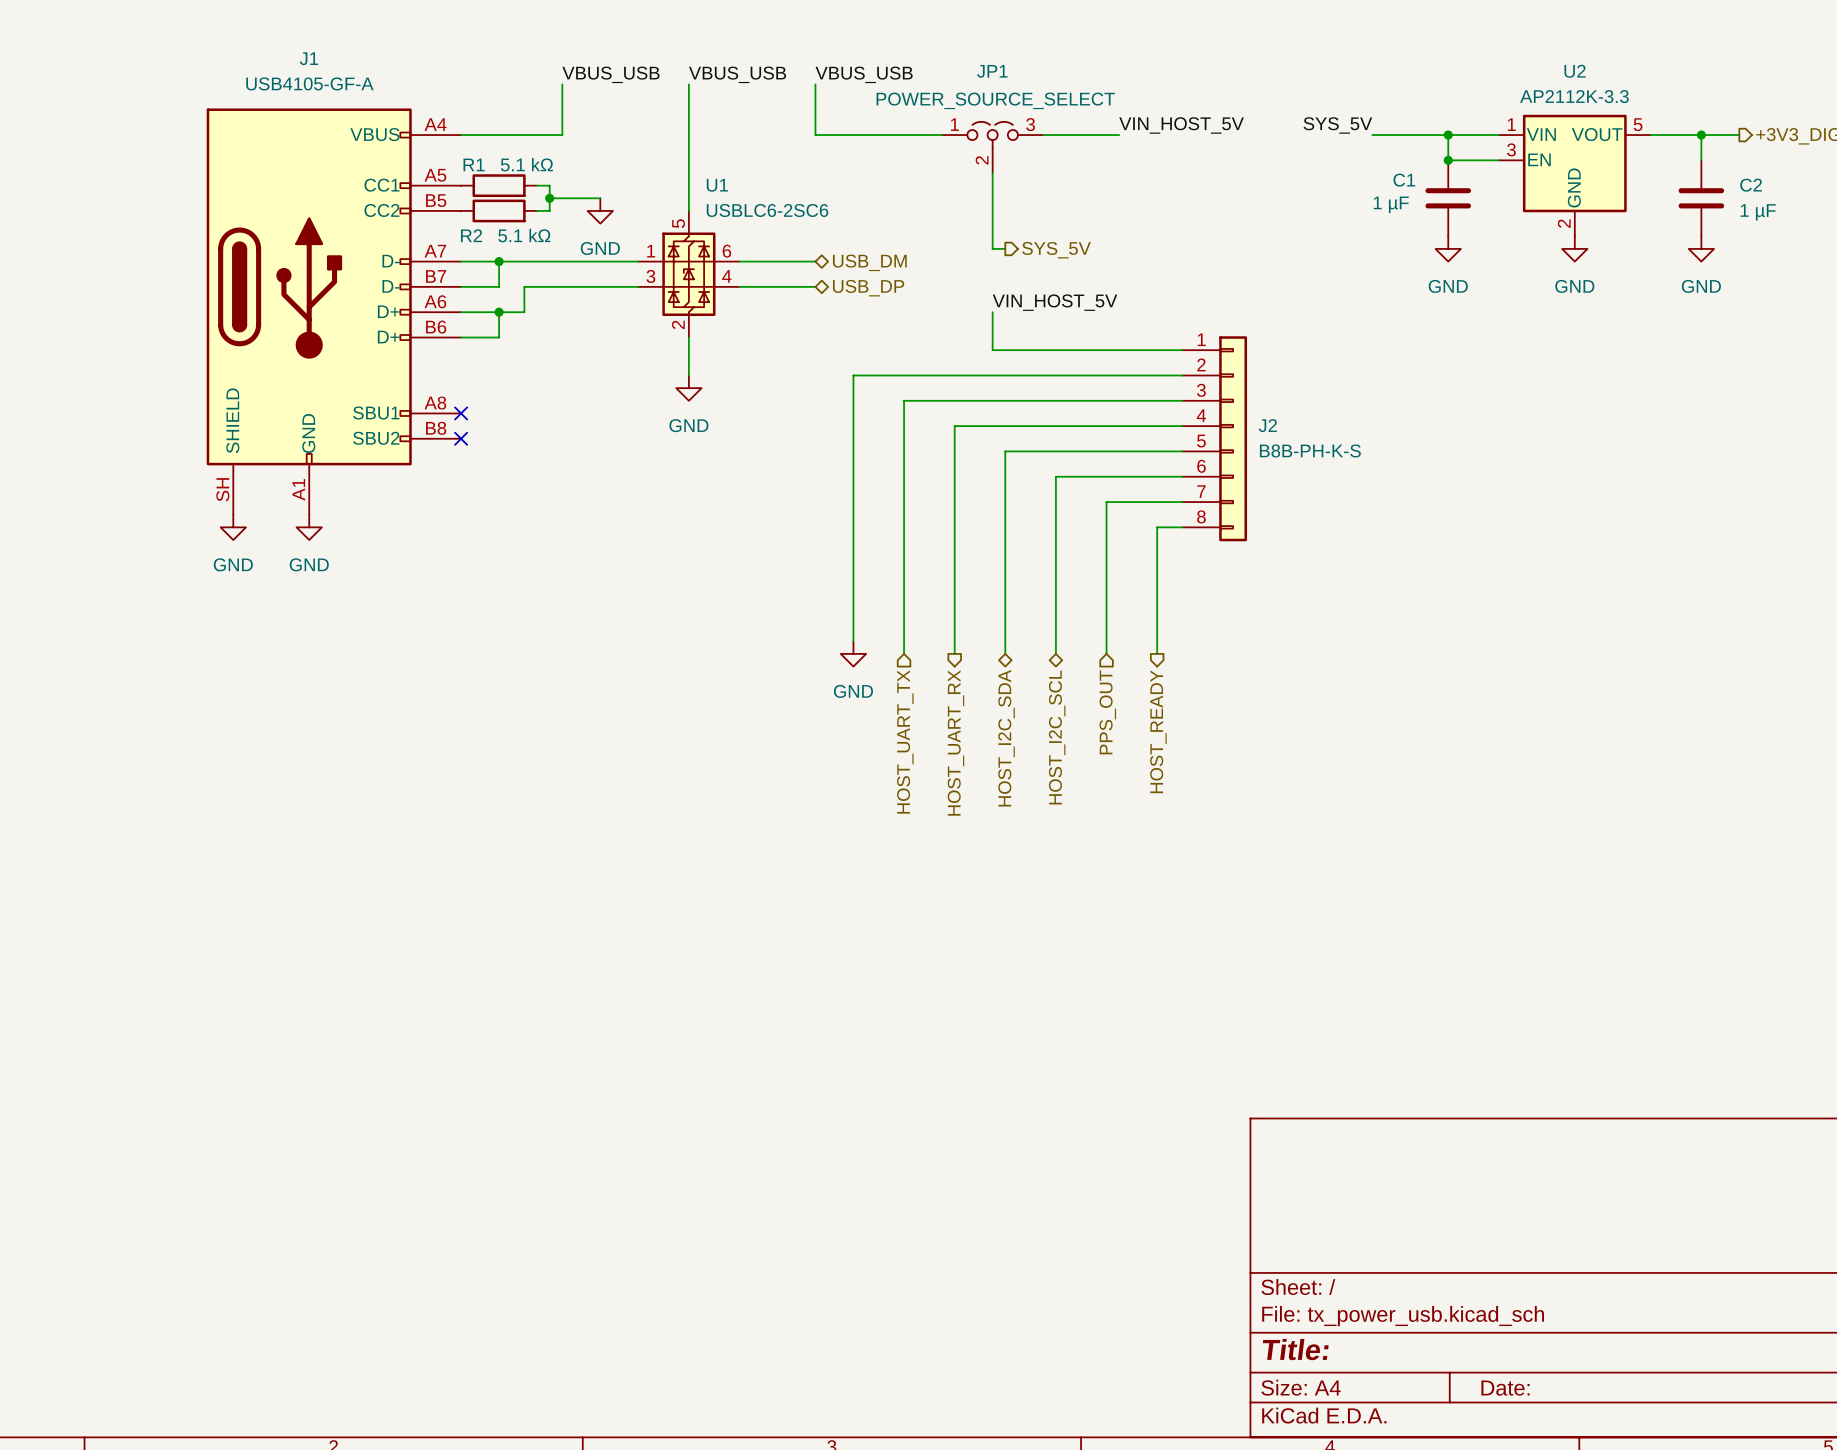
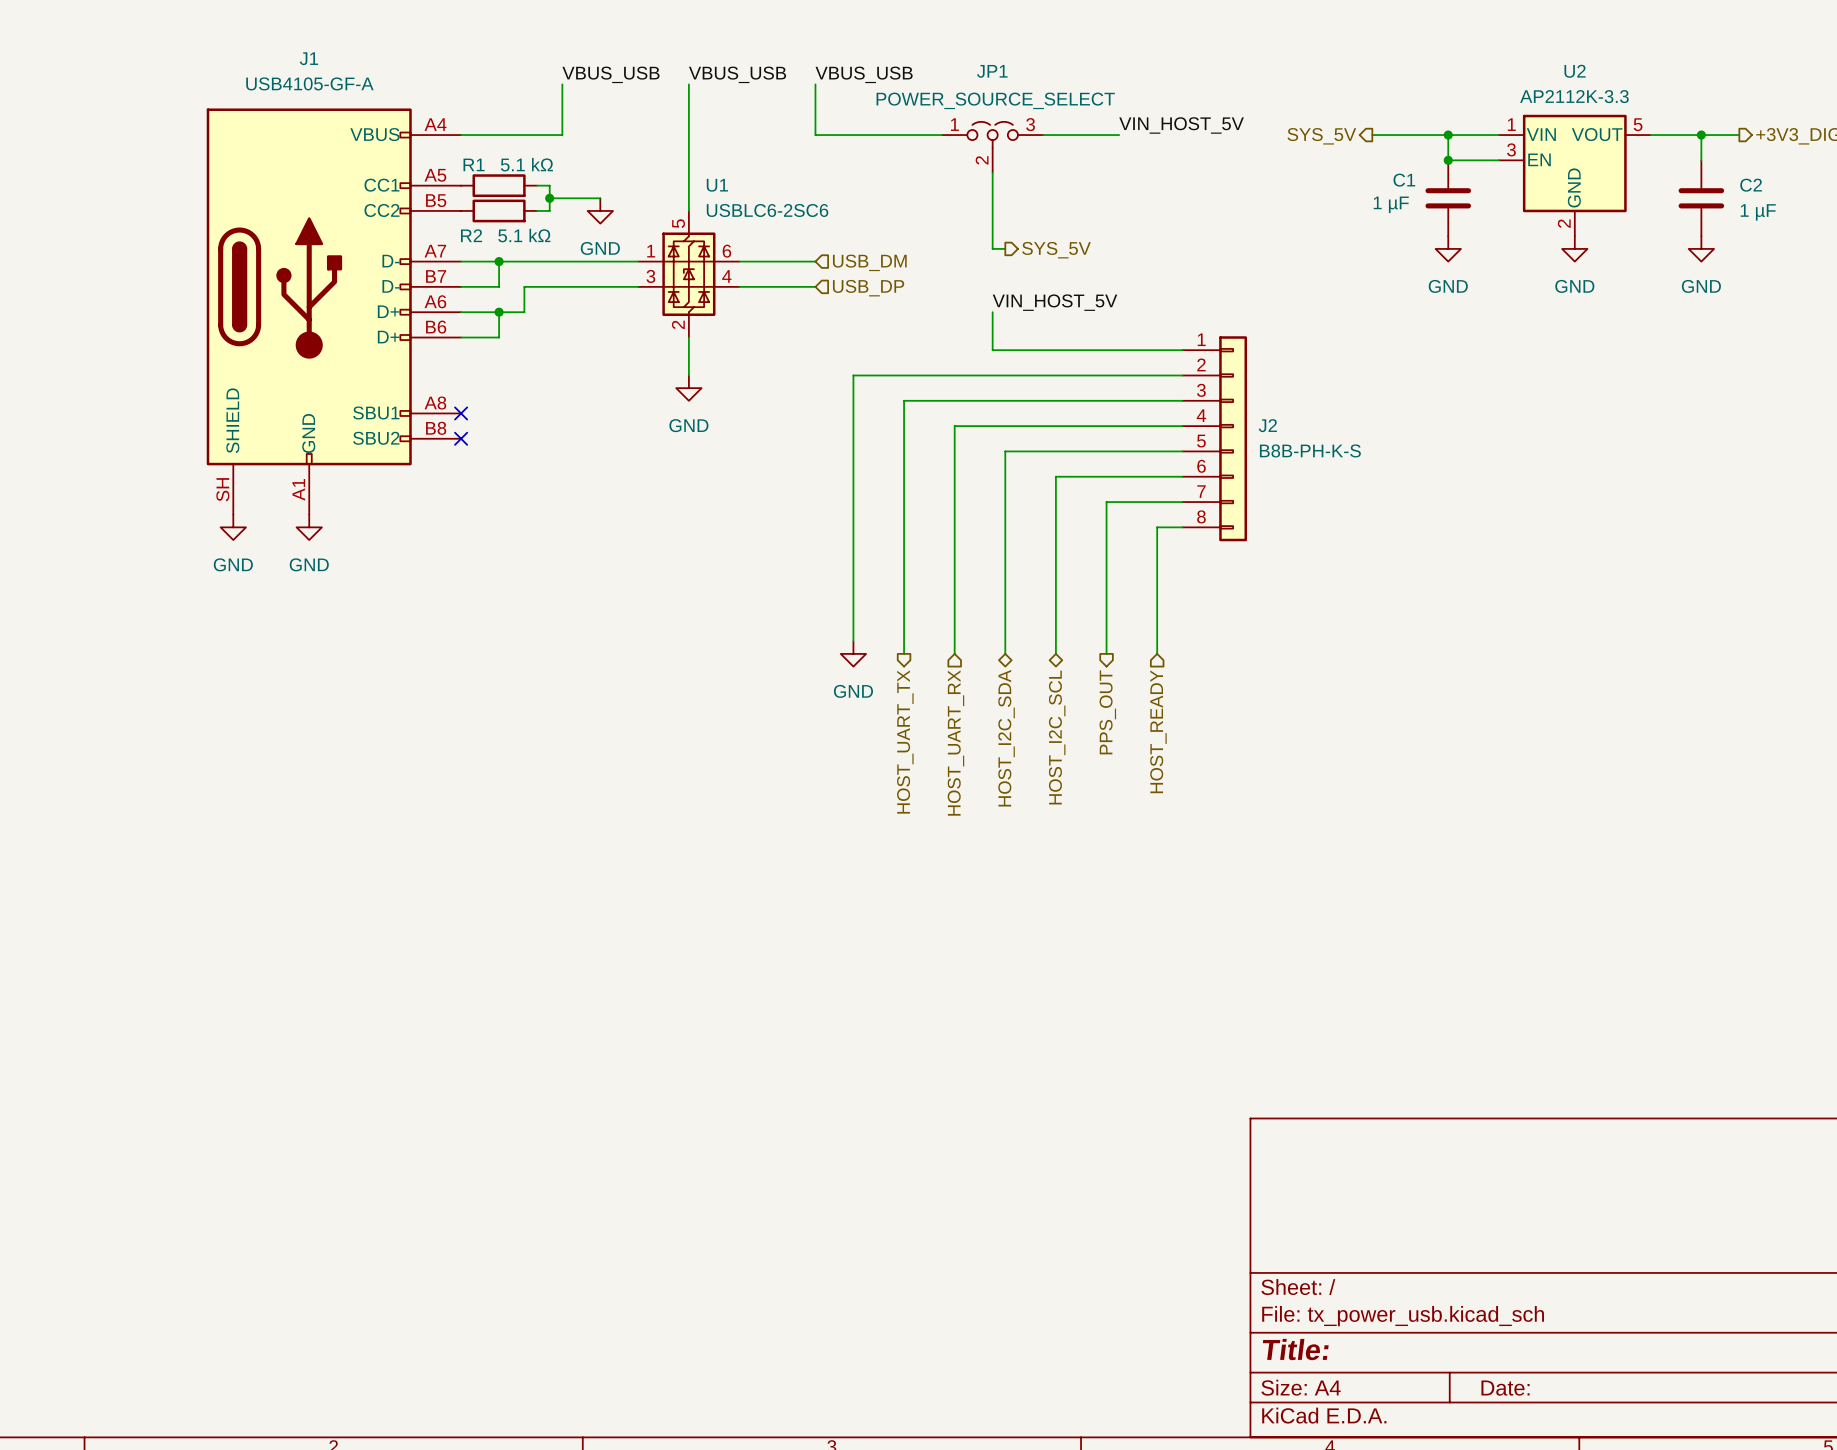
label: SYS_5V (1337, 125) -> none
hierarchical label: none -> SYS_5V (1321, 136)
hierarchical label shape: bidirectional (869, 262) -> input (869, 262)
hierarchical label shape: bidirectional (868, 288) -> input (868, 288)
hierarchical label shape: input (1107, 712) -> output (1107, 712)
hierarchical label shape: output (1158, 731) -> input (1158, 731)
hierarchical label shape: input (905, 742) -> output (905, 742)
hierarchical label shape: output (955, 743) -> input (955, 743)

